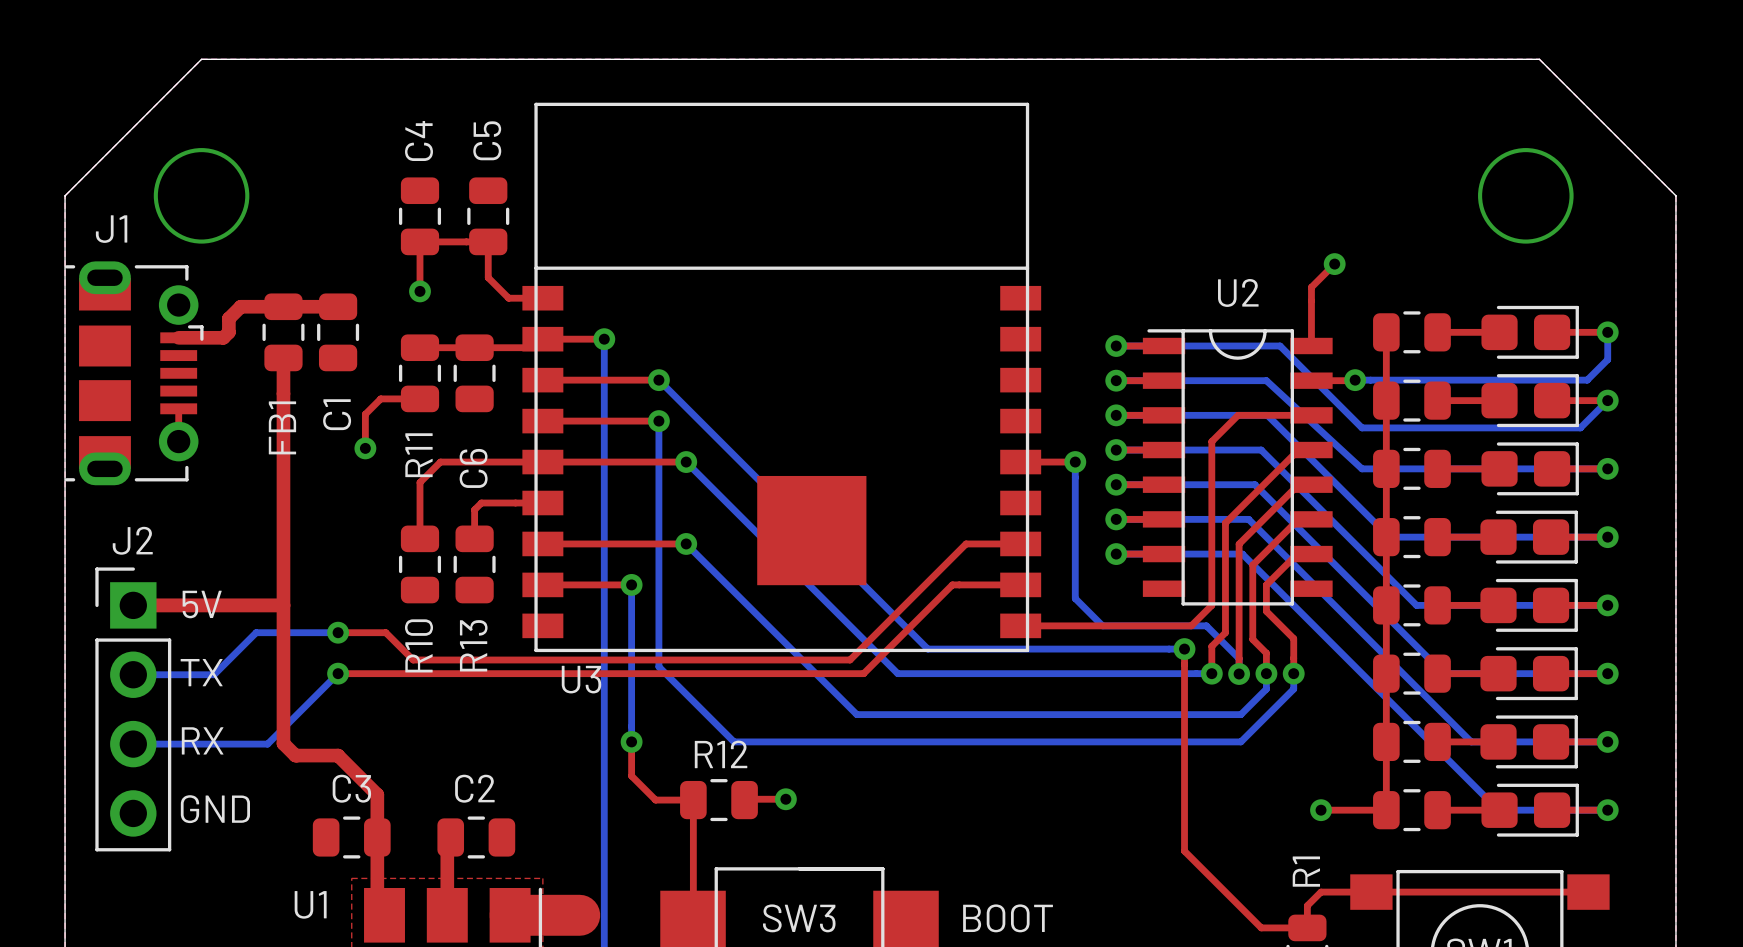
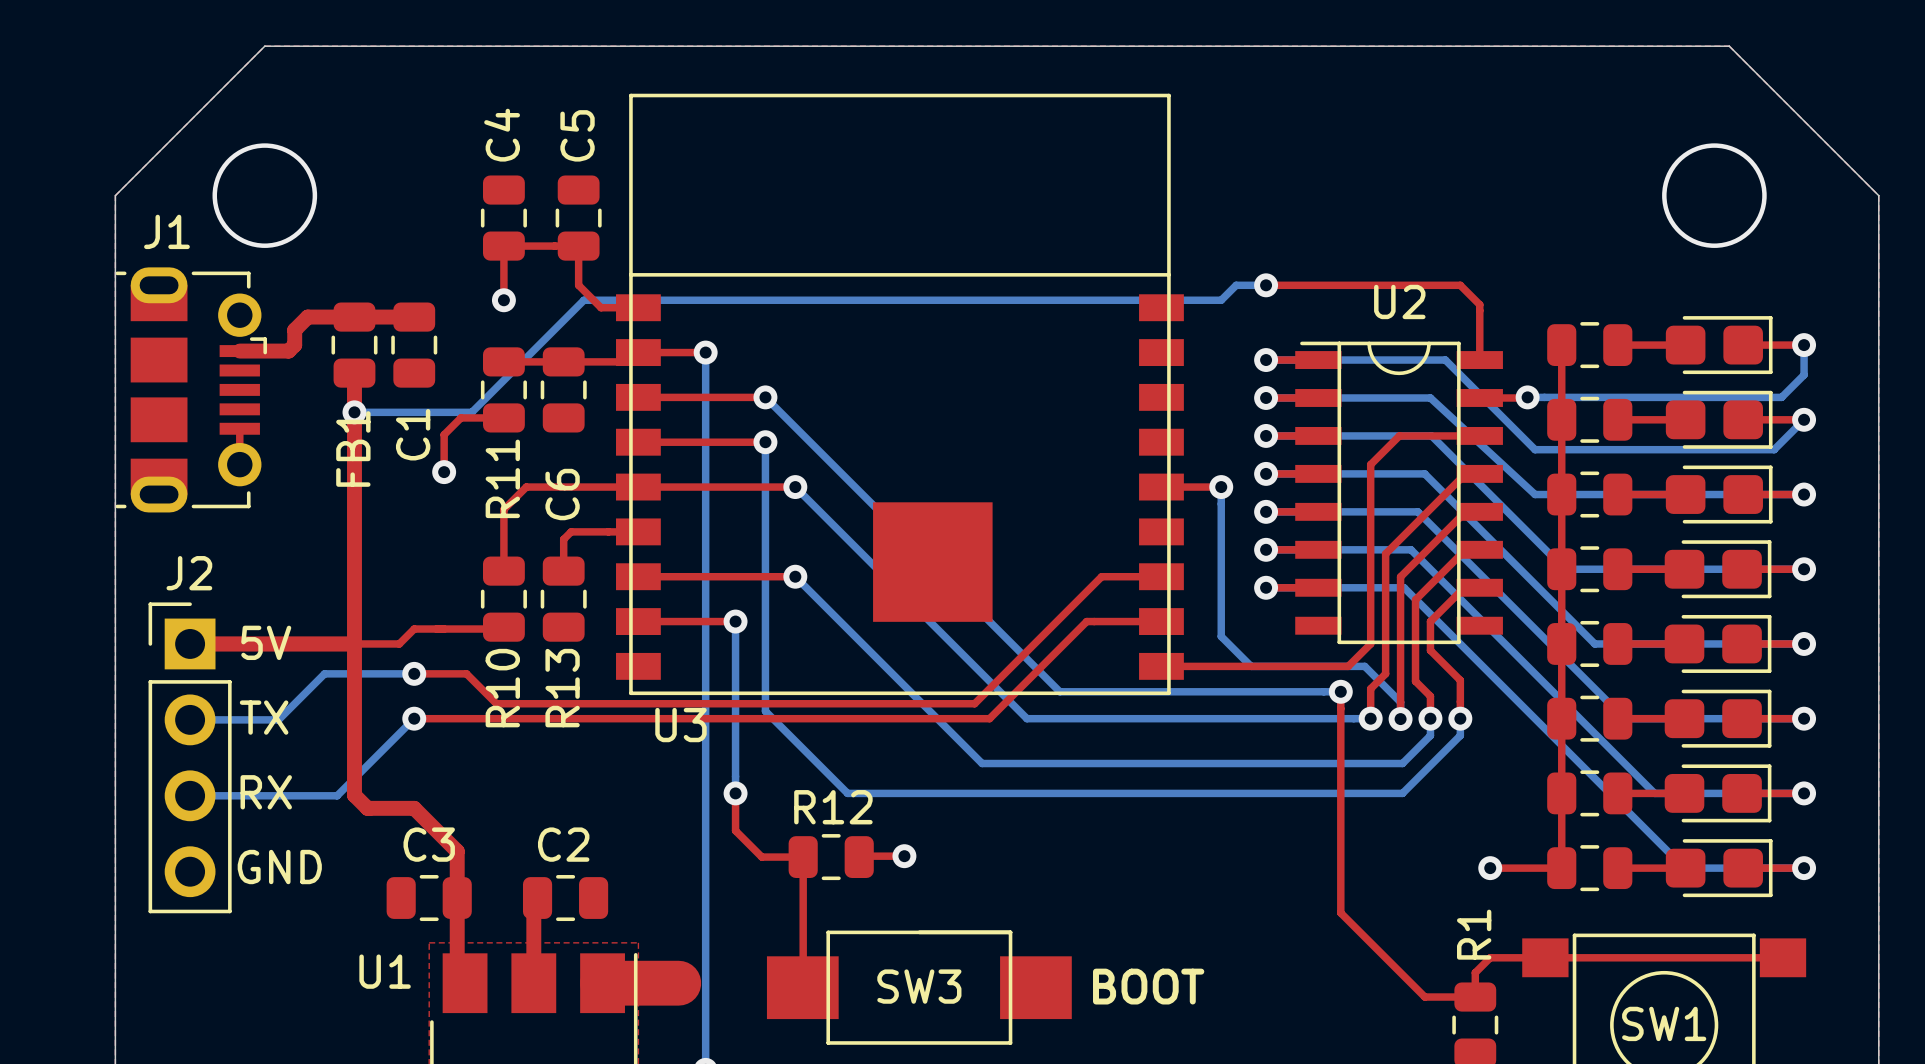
top track: (1334, 264) (1311, 287) (1311, 295) -> (1266, 285) (1460, 285) (1479, 304)
via: (1334, 264) -> none
bottom track: none -> (1266, 285) (1236, 285) (1221, 300) (583, 300) (471, 412) (354, 412)
via: none -> (1266, 285)
via: none -> (354, 412)
top track: none -> (502, 629) (414, 629) (399, 643) (354, 643)

